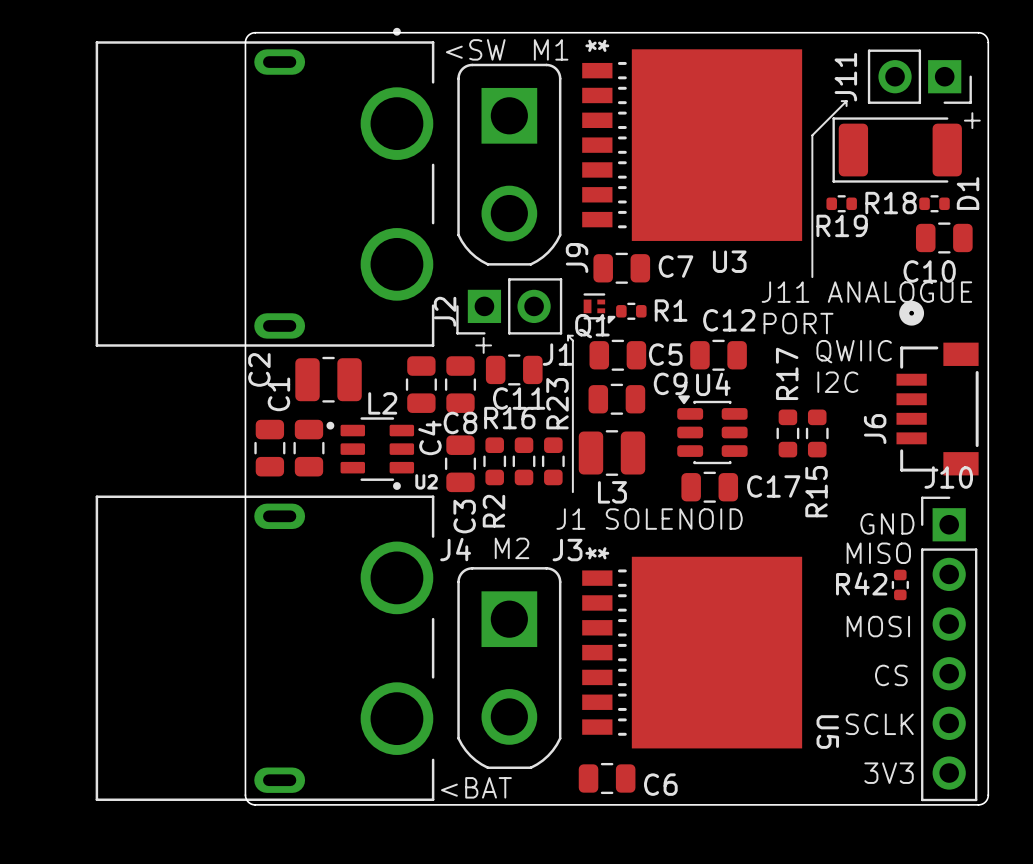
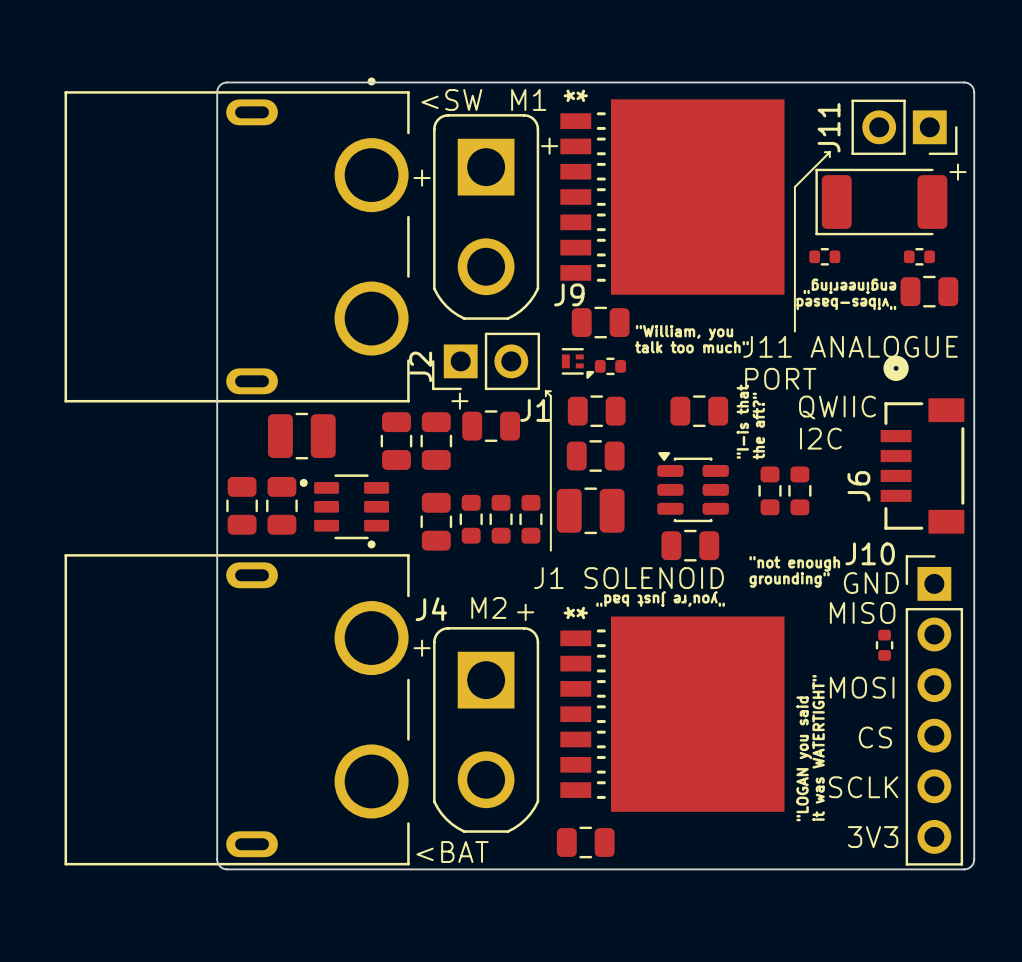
text: none -> + (549, 146)
text: none -> + (422, 178)
D1 name: D1 (968, 193) -> none
R18 name: R18 (891, 203) -> none
R19 name: R19 (842, 225) -> none
text: none -> engineering" (849, 286)
text: none -> "vibes-based (846, 303)
J9 name rotation: 0° (577, 258) -> 90° clockwise (569, 294)
U3 name: U3 (729, 261) -> none
C7 name: C7 (675, 266) -> none
C10 name: C10 (929, 271) -> none
text: none -> "William, you (684, 332)
text: none -> talk too much" (691, 347)
R1 name: R1 (671, 310) -> none
C12 name: C12 (729, 320) -> none
Q1 name: Q1 (592, 326) -> none
C5 name: C5 (665, 354) -> none
text: none -> "I-is that (742, 421)
C2 name: C2 (259, 369) -> none
text: none -> the aft?" (758, 426)
R17 name: R17 (787, 373) -> none
C9 name: C9 (670, 383) -> none
U4 name: U4 (713, 384) -> none
C1 name: C1 (278, 394) -> none
C11 name: C11 (519, 398) -> none
L2 name: L2 (382, 403) -> none
R23 name: R23 (557, 403) -> none
R16 name: R16 (509, 418) -> none
C8 name: C8 (460, 422) -> none
C4 name: C4 (429, 437) -> none
J10 name position: J10 (948, 477) -> J10 (870, 553)
U2 name: U2 (426, 481) -> none
C17 name: C17 (773, 486) -> none
R15 name: R15 (816, 491) -> none
L3 name: L3 (612, 492) -> none
text: none -> "not enough (794, 563)
R2 name: R2 (493, 511) -> none
C3 name: C3 (464, 516) -> none
text: none -> grounding" (789, 579)
text: none -> "you're just bad" (660, 599)
J3 name: J3 (567, 550) -> none
text: none -> + (525, 612)
R42 name: R42 (861, 583) -> none
text: none -> + (422, 648)
text: none -> it was WATERTIGHT" (818, 748)
text: none -> "LOGAN you said (804, 758)
U5 name: U5 (827, 732) -> none
C6 name: C6 (660, 784) -> none

